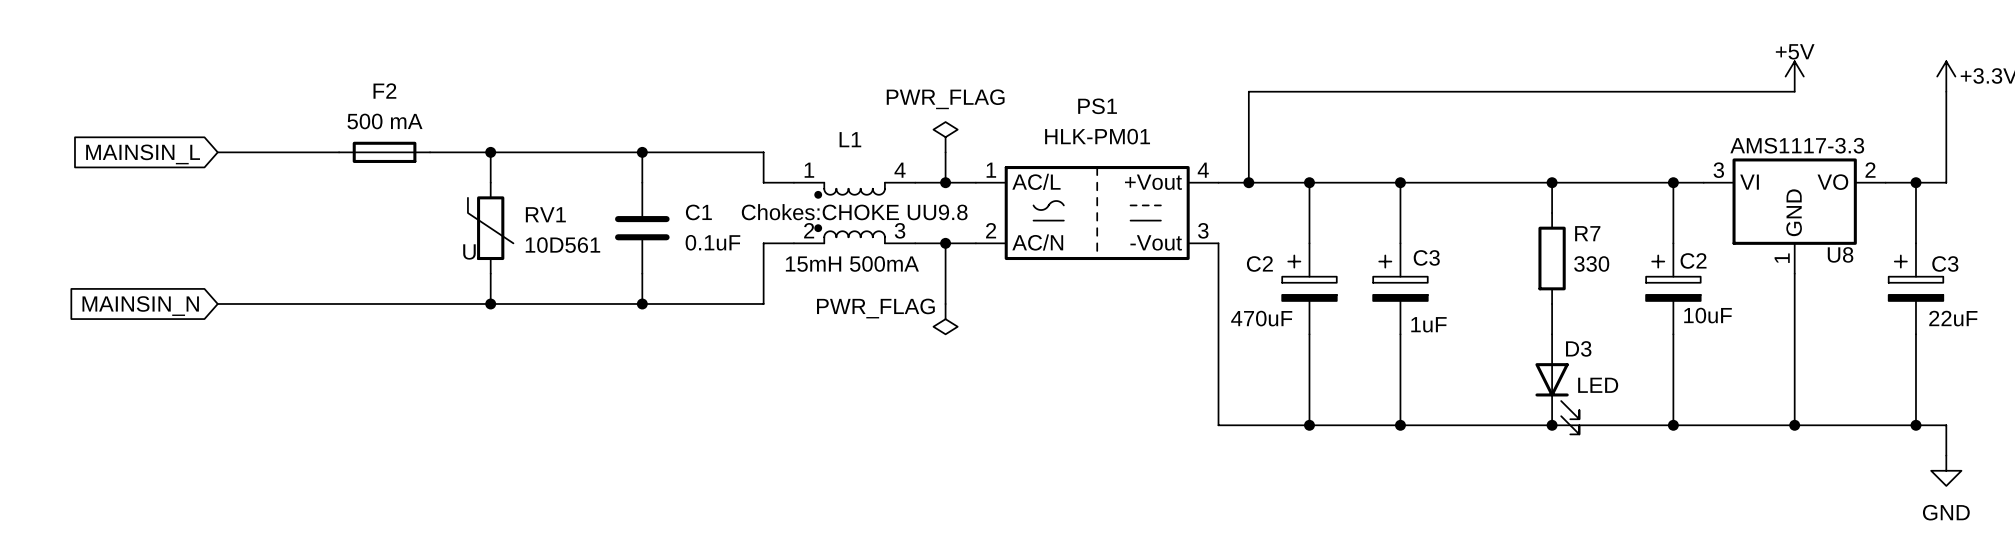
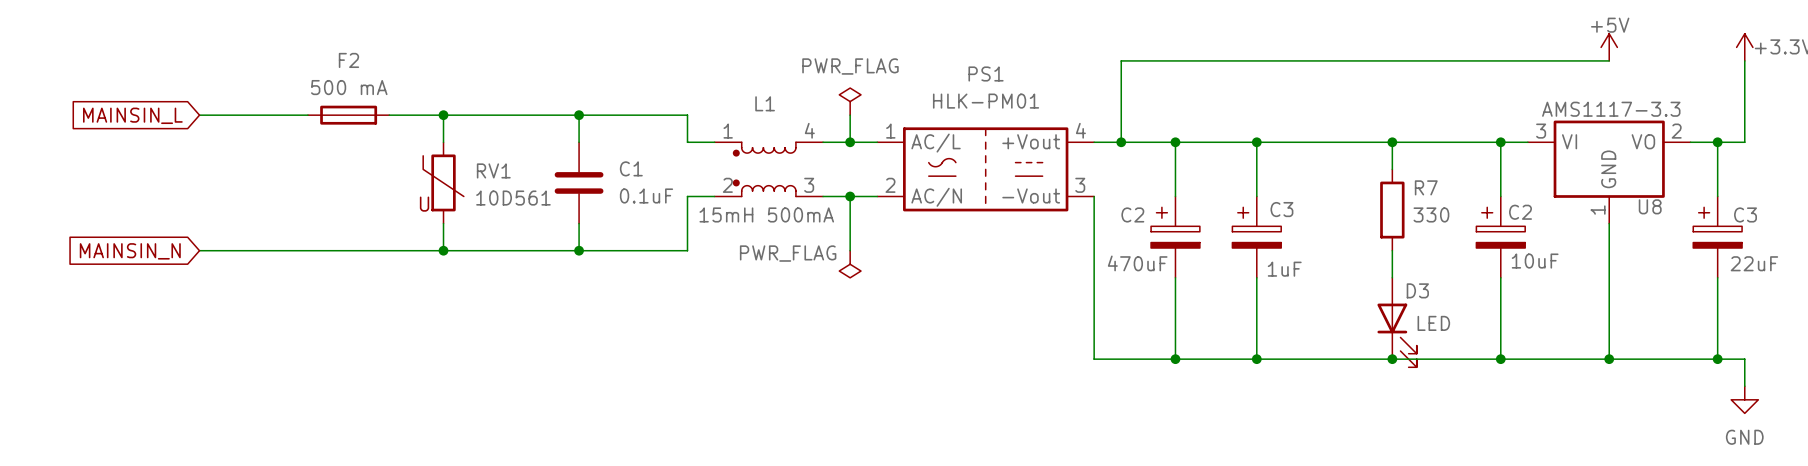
L1 text: Chokes:CHOKE UU9.8 (854, 212) -> none

